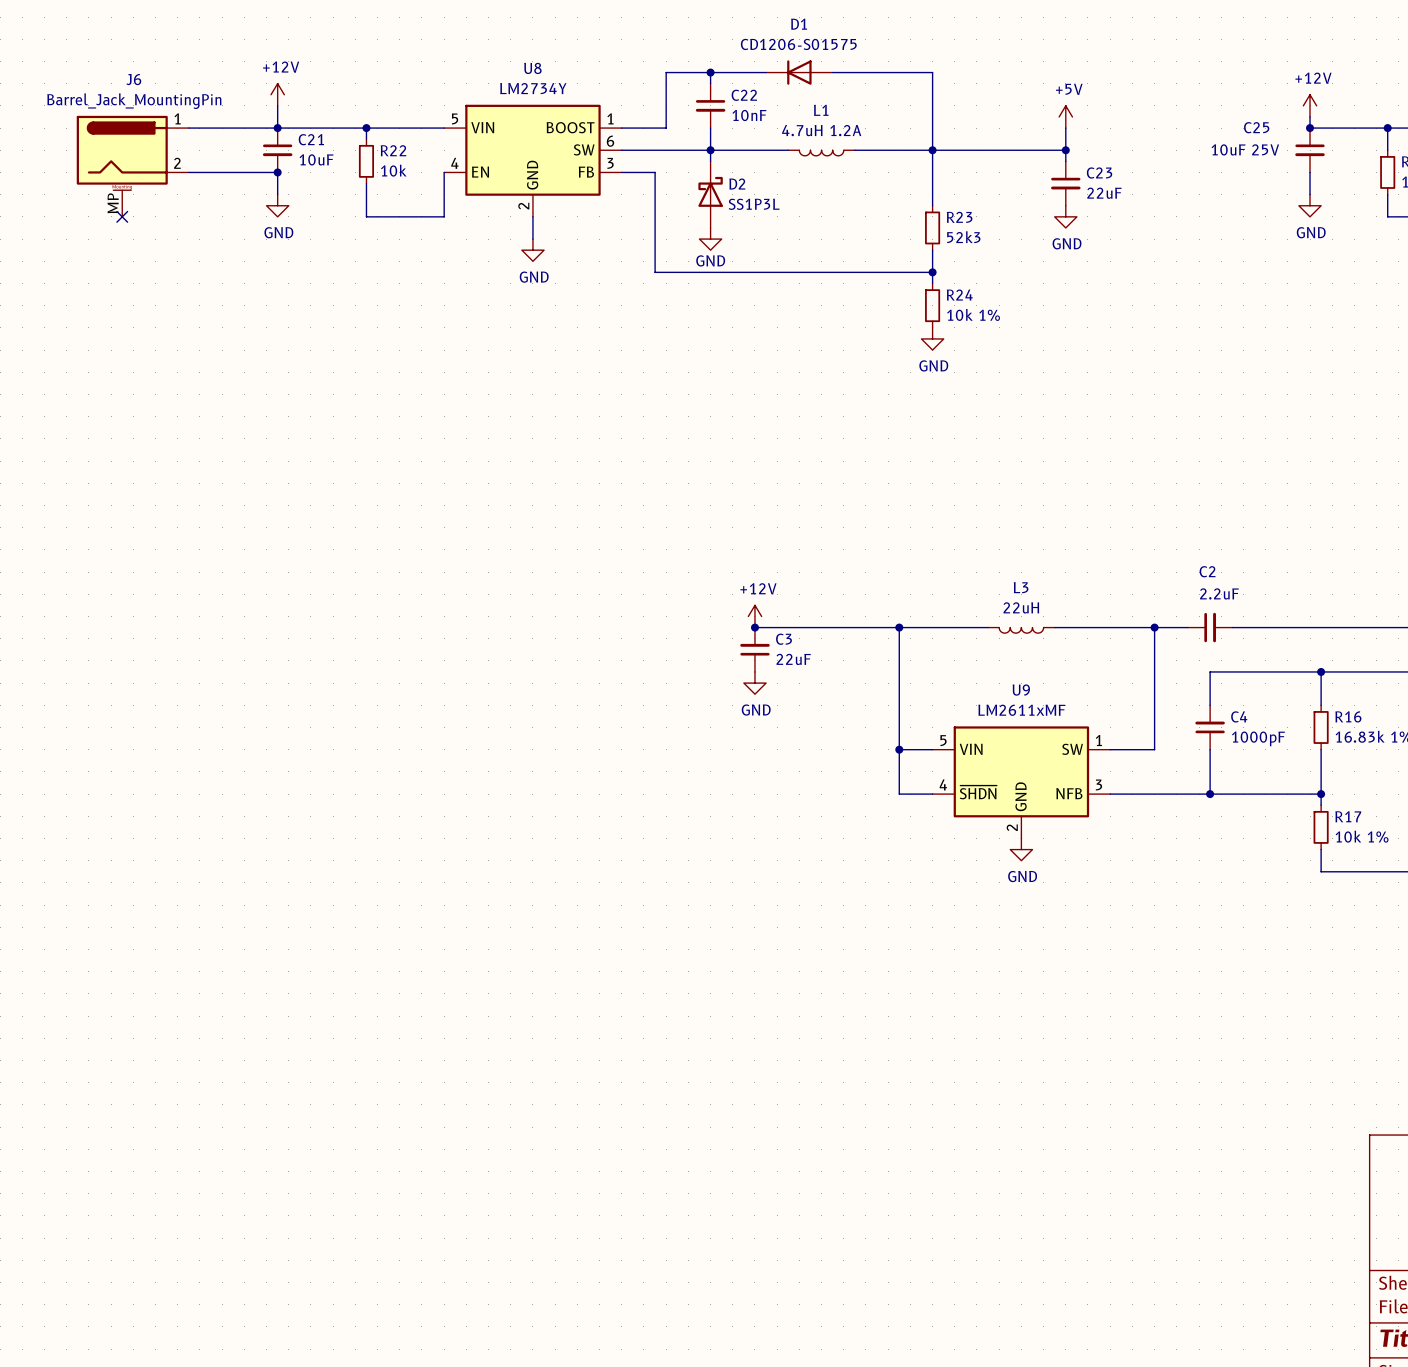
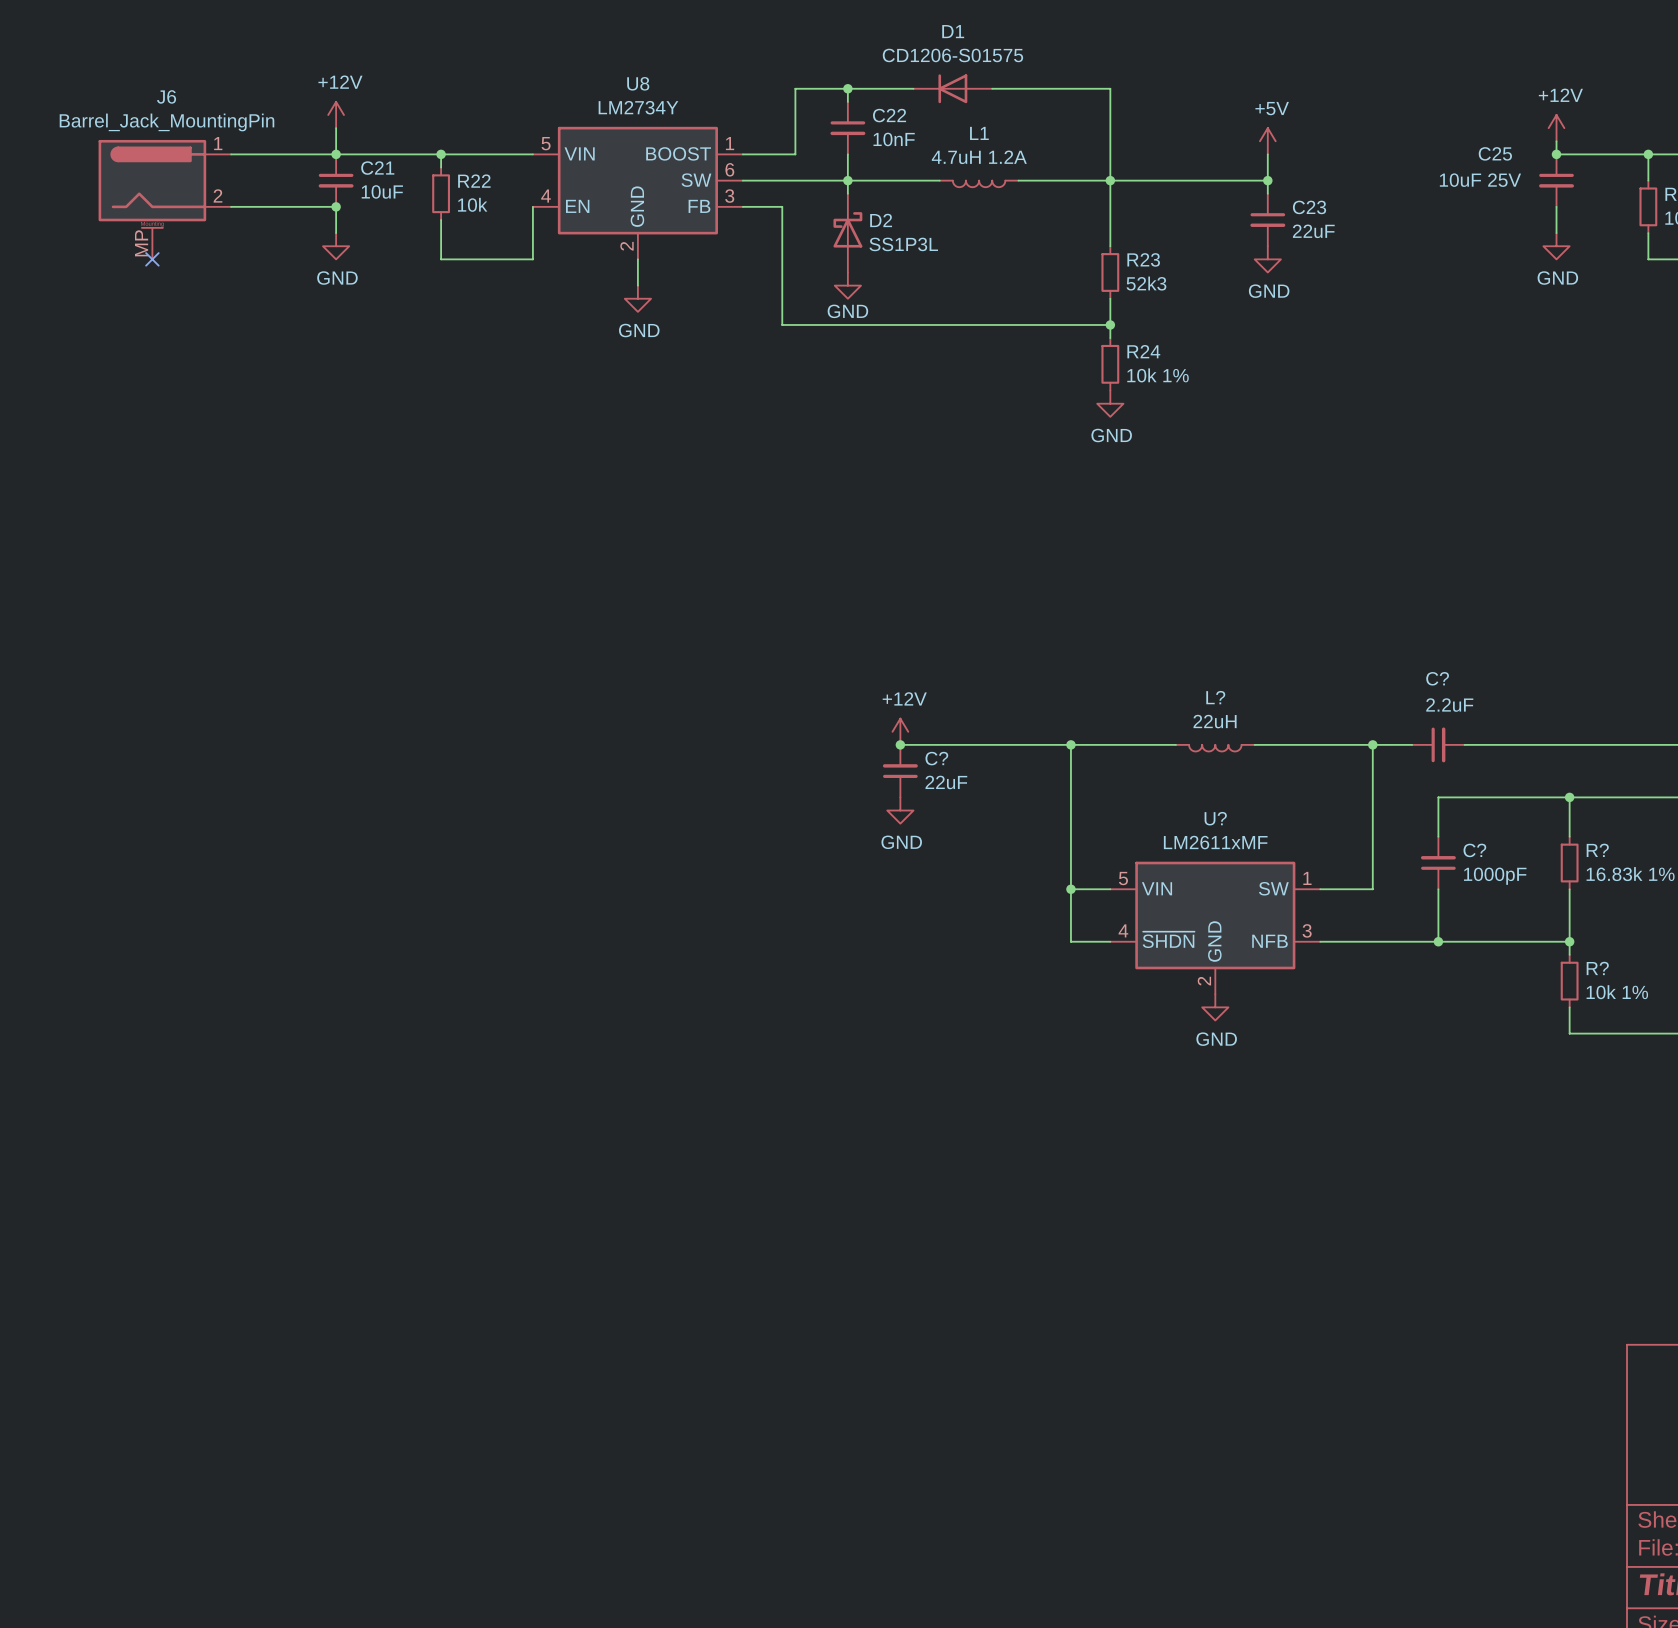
C2 name: C2 (1207, 571) -> C? (1437, 678)
L3 name: L3 (1021, 587) -> L? (1215, 697)
C3 name: C3 (783, 639) -> C? (936, 758)
U9 name: U9 (1021, 690) -> U? (1215, 818)
C4 name: C4 (1239, 716) -> C? (1474, 850)
R16 name: R16 (1348, 716) -> R? (1597, 850)
R17 name: R17 (1348, 816) -> R? (1597, 968)

